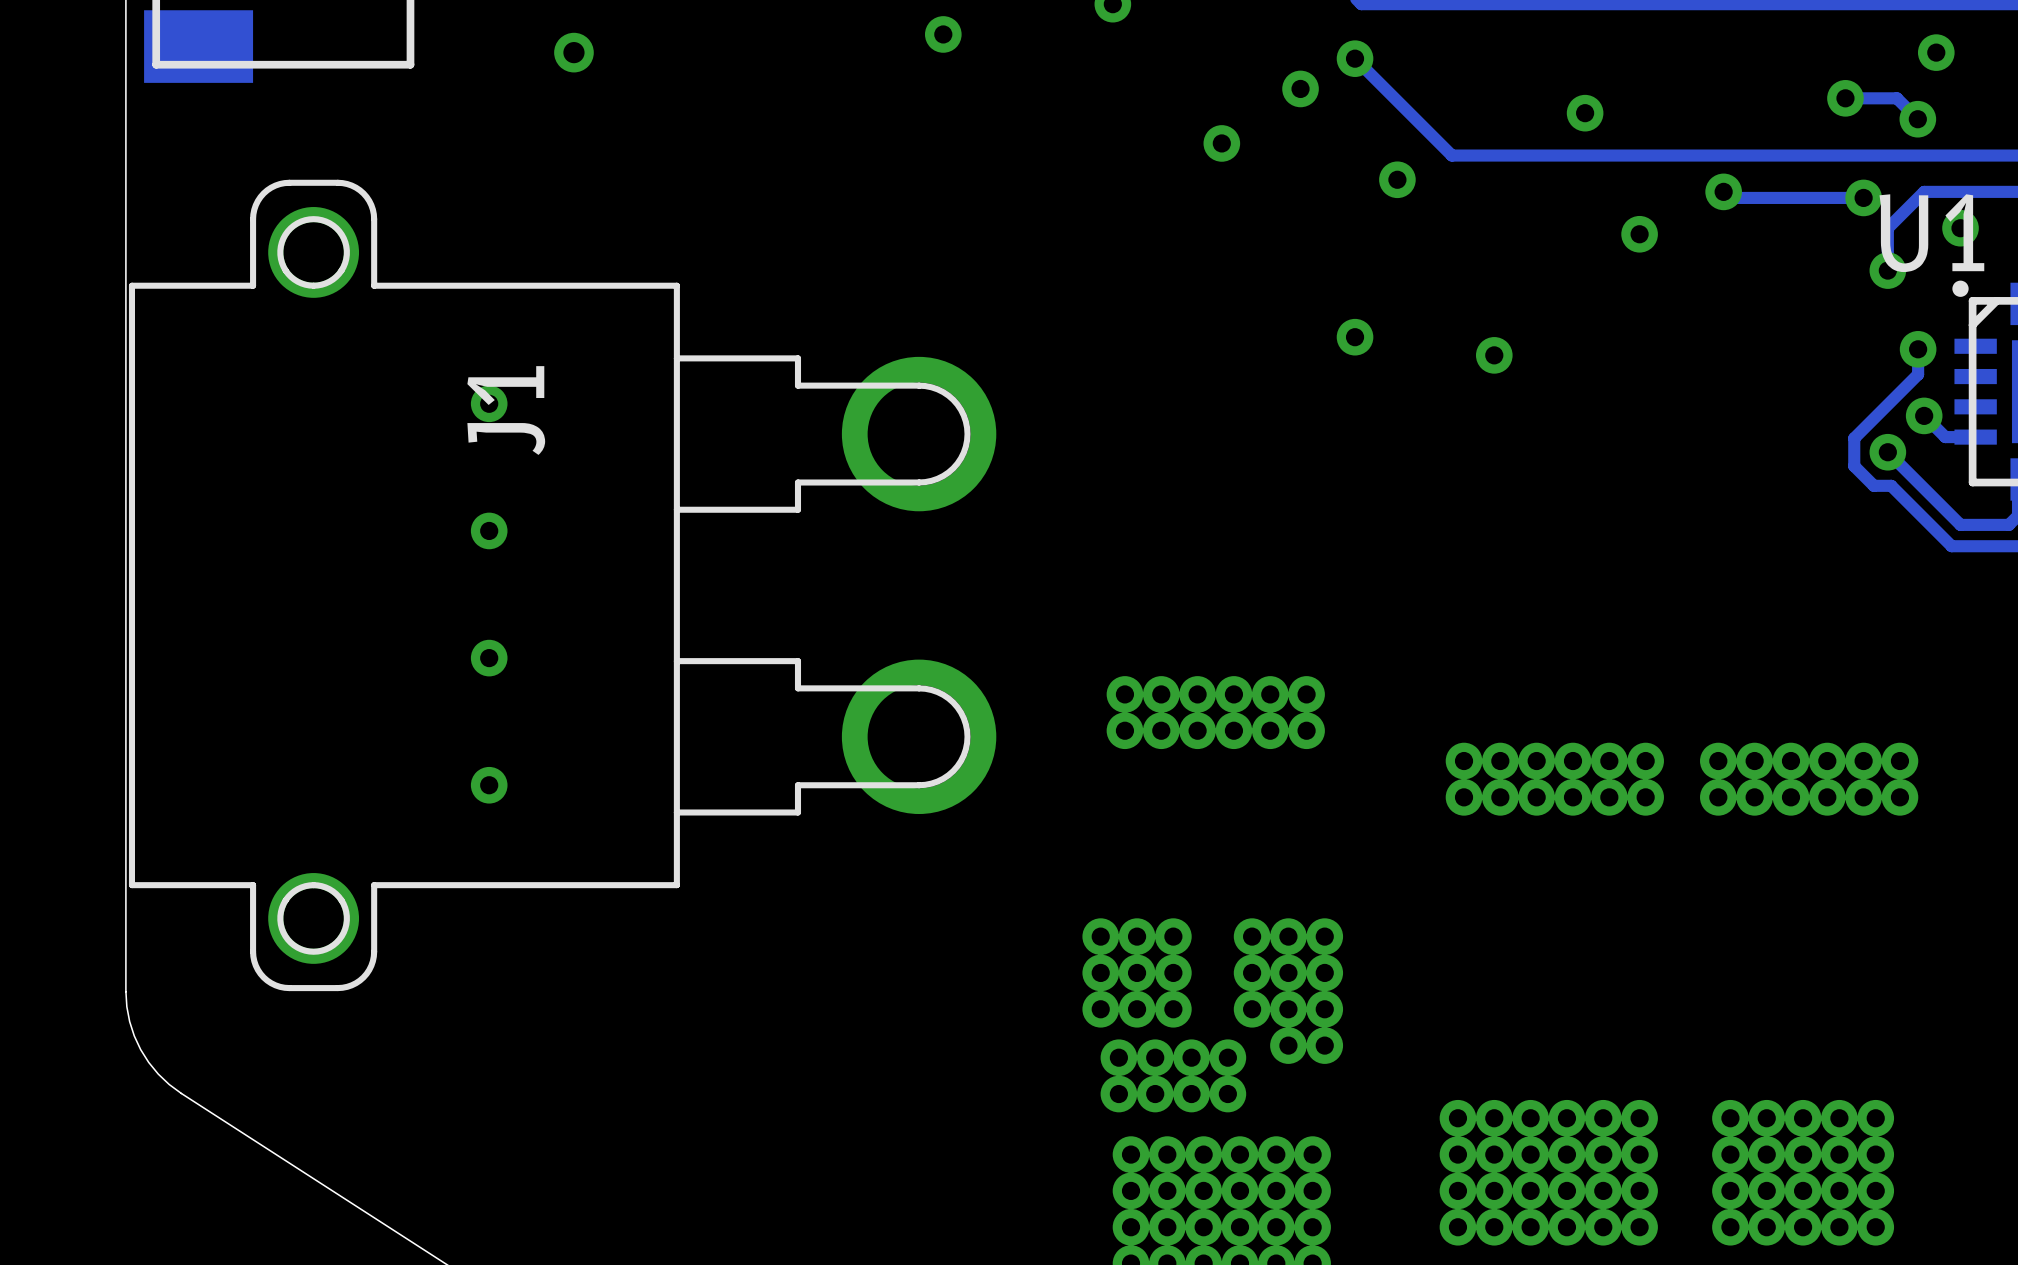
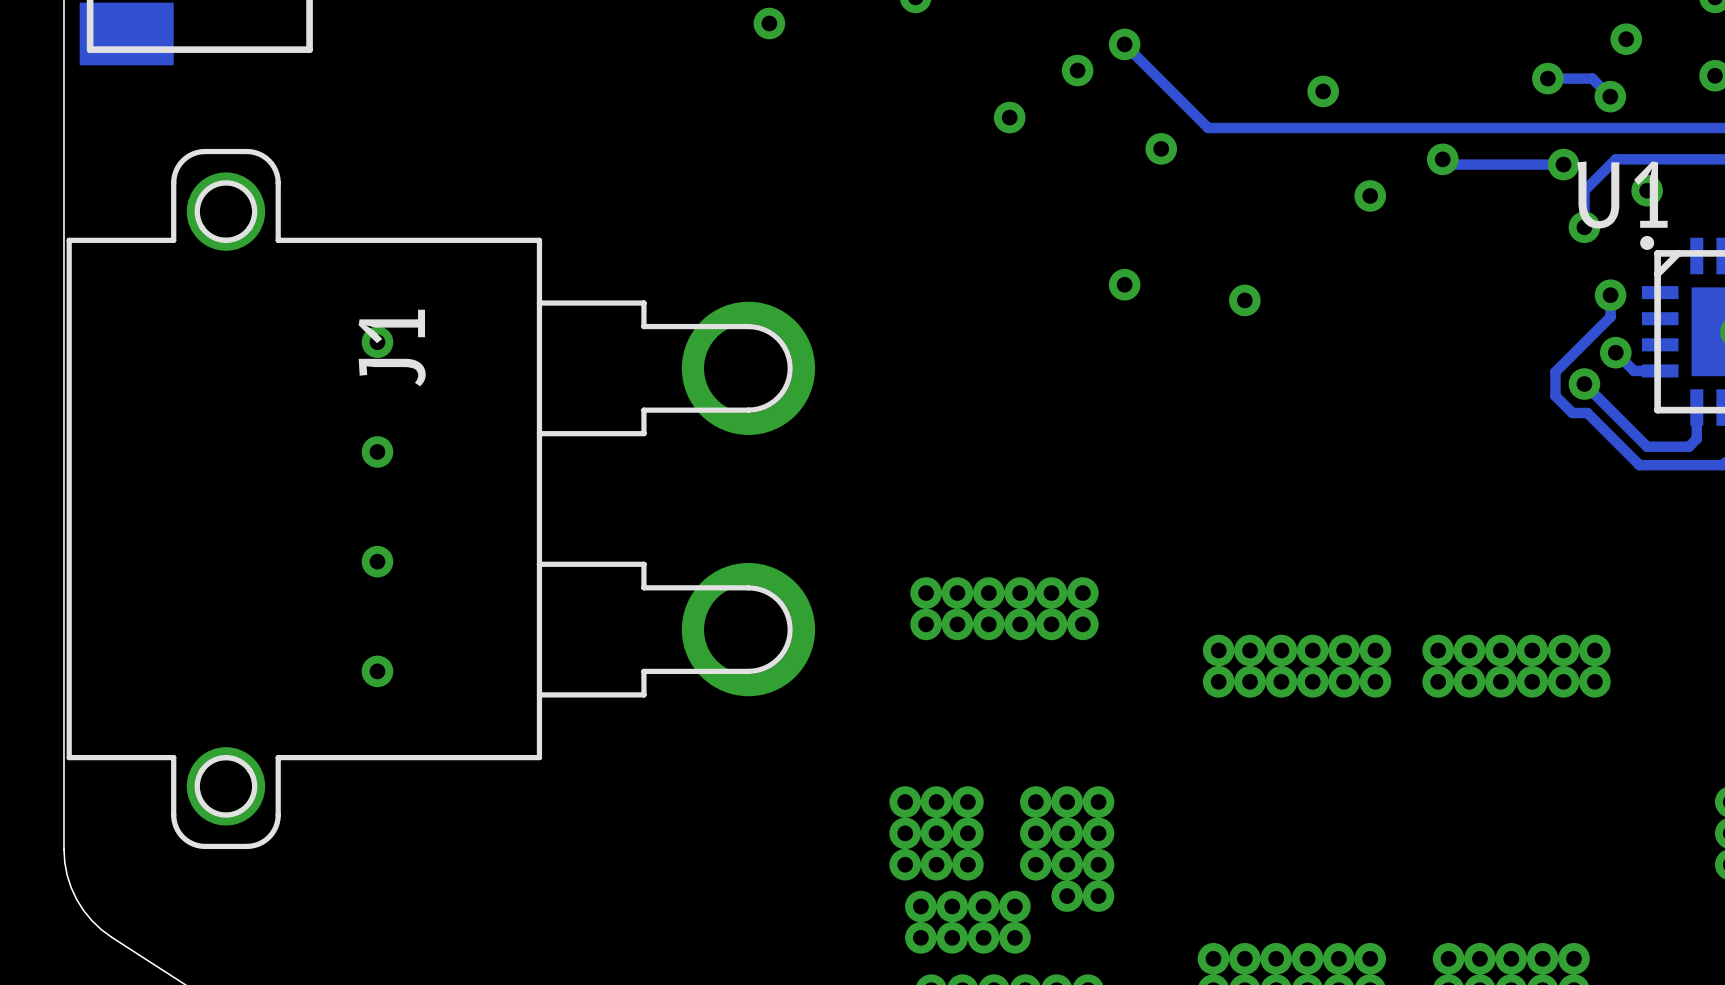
via: (573, 52) -> none

